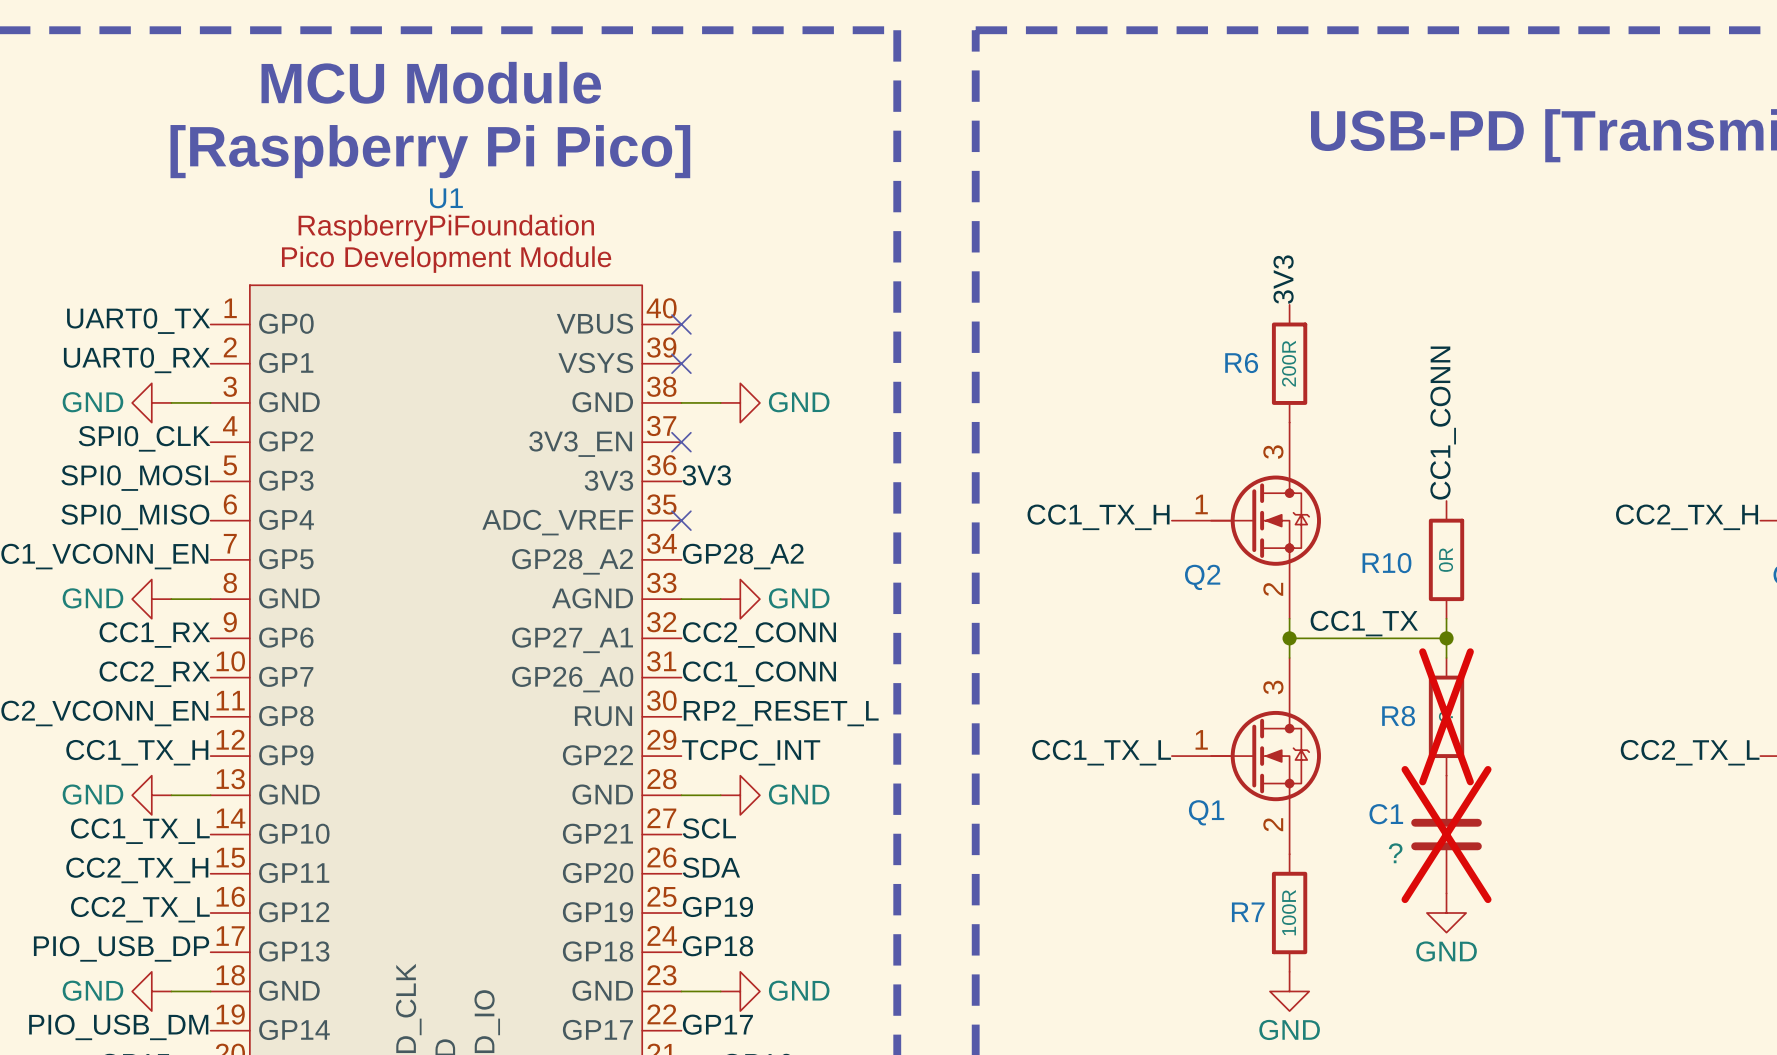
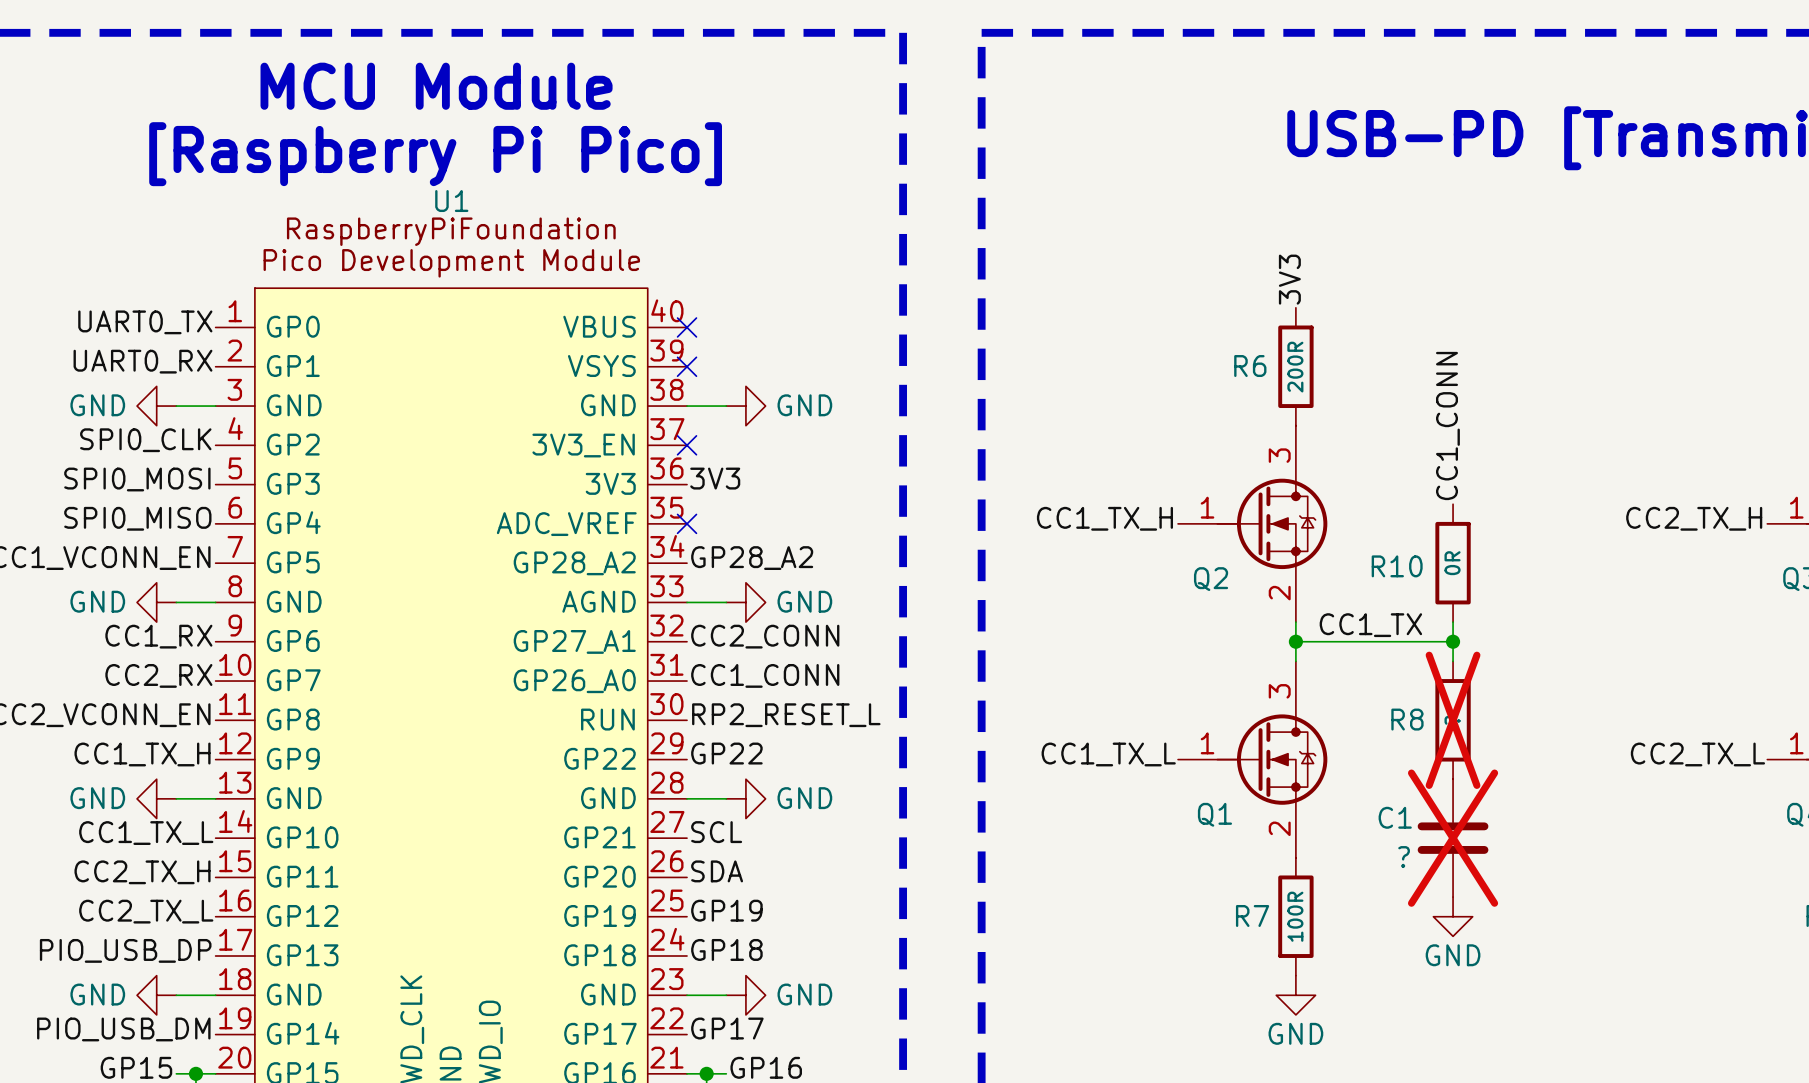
label: TCPC_INT (751, 752) -> GP22 (726, 753)

